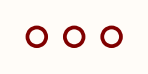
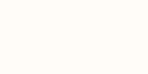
part: (36, 36) -> none
part: (74, 36) -> none
part: (111, 36) -> none

